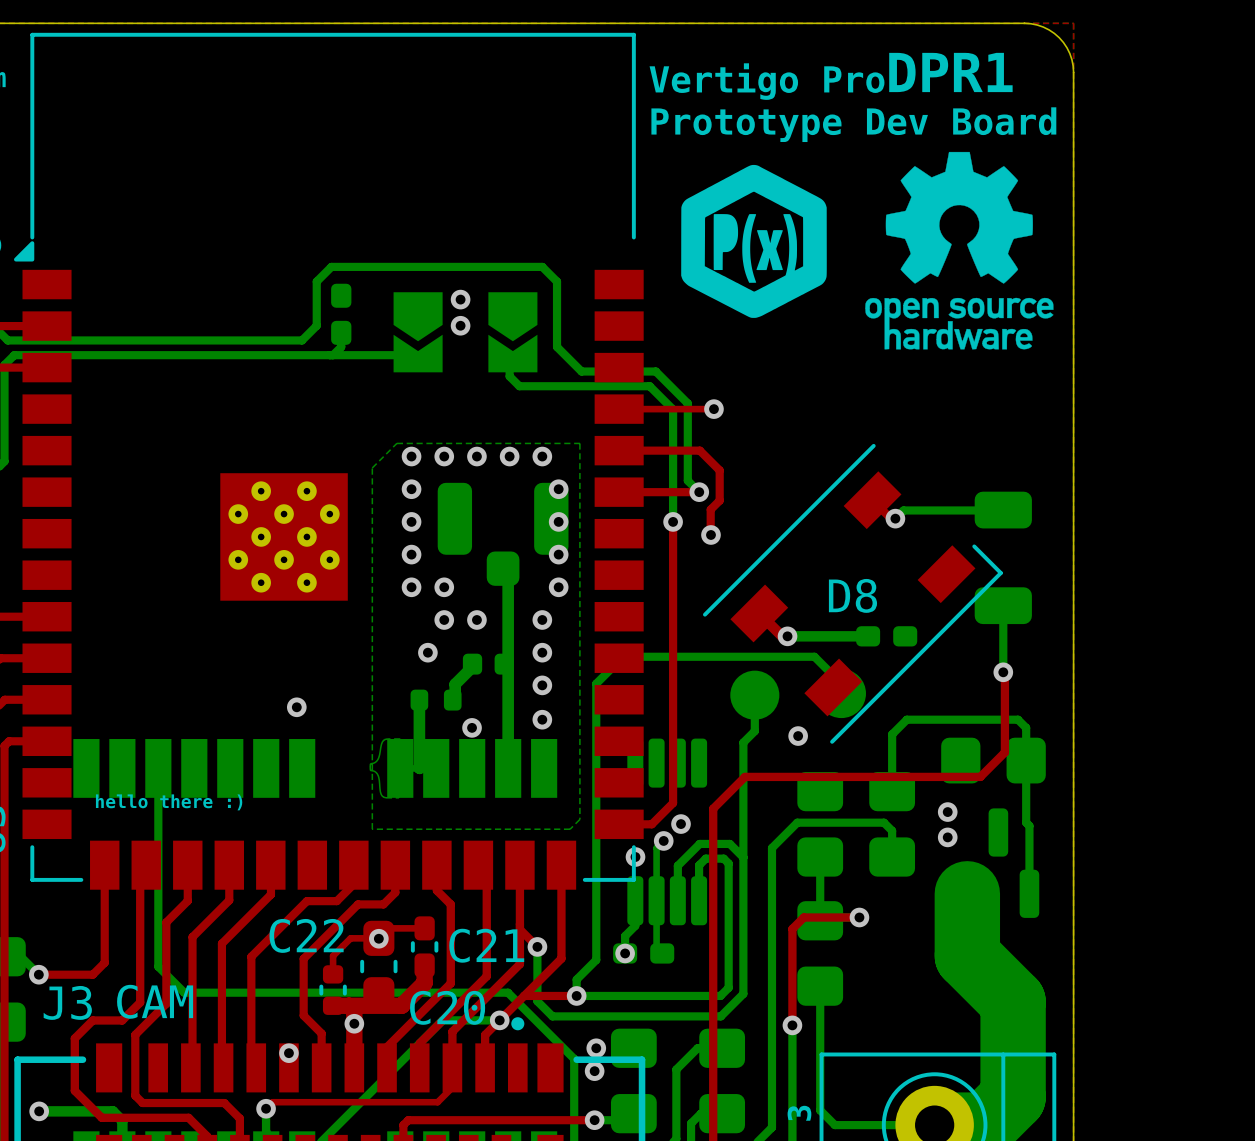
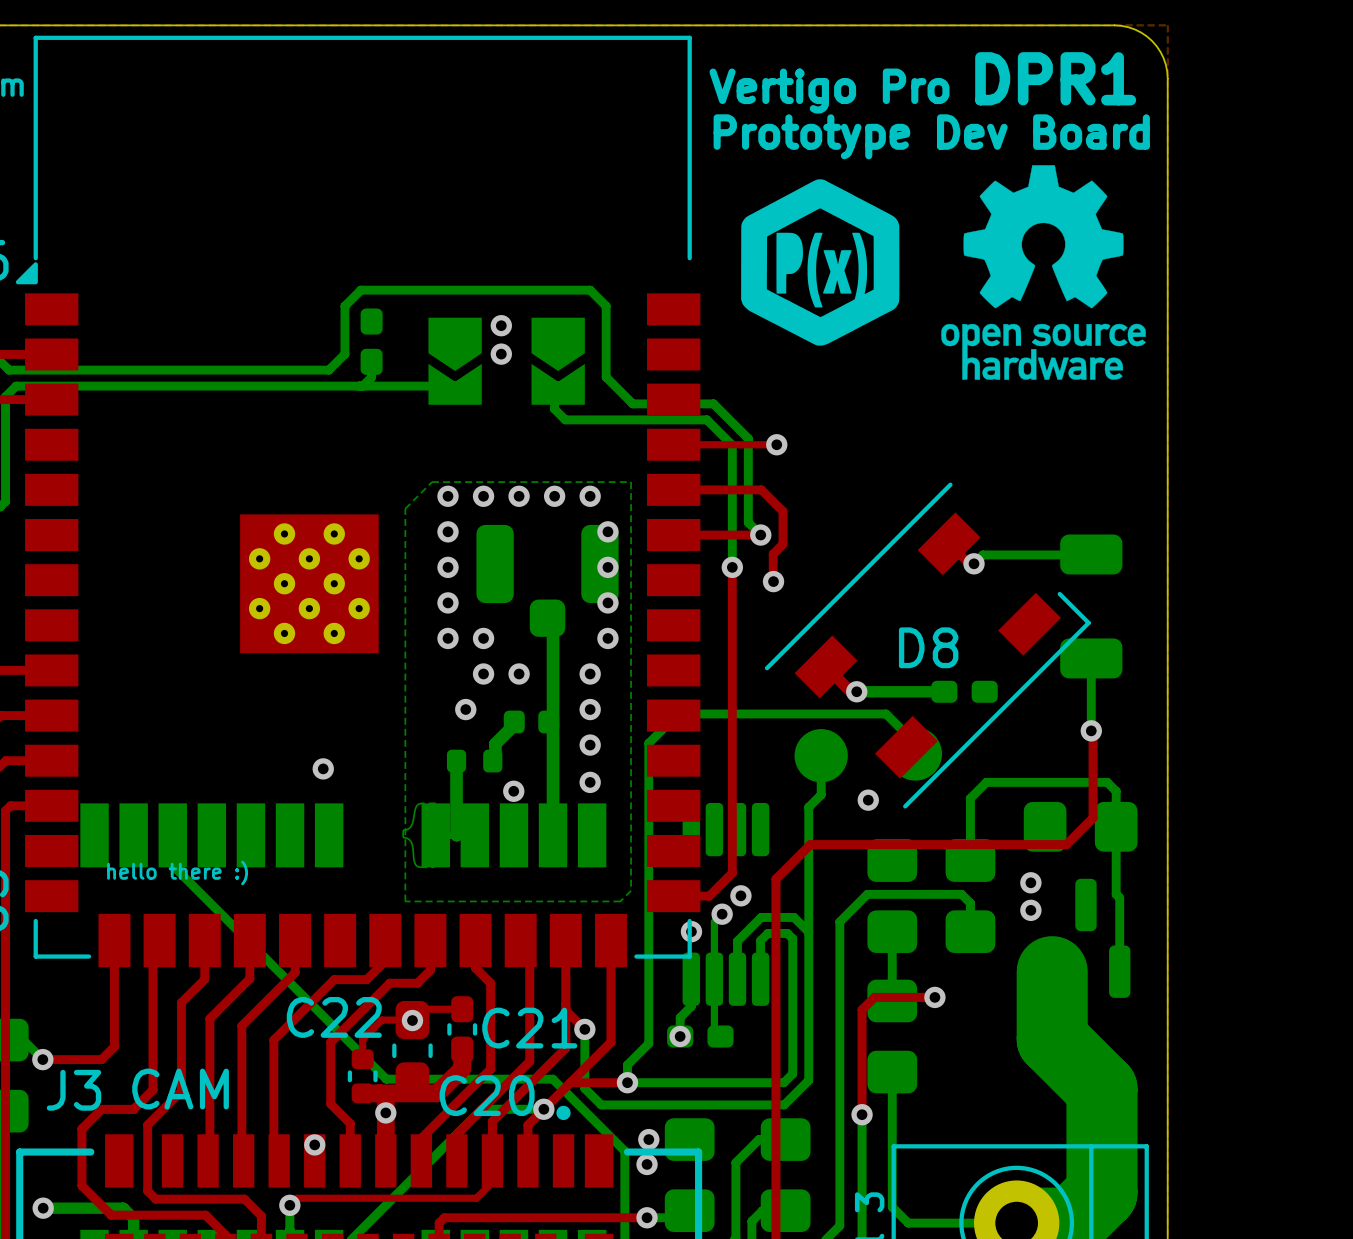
bottom track: (158, 796) (158, 966) (184, 992) (354, 992) -> (172, 865) (386, 1079)

